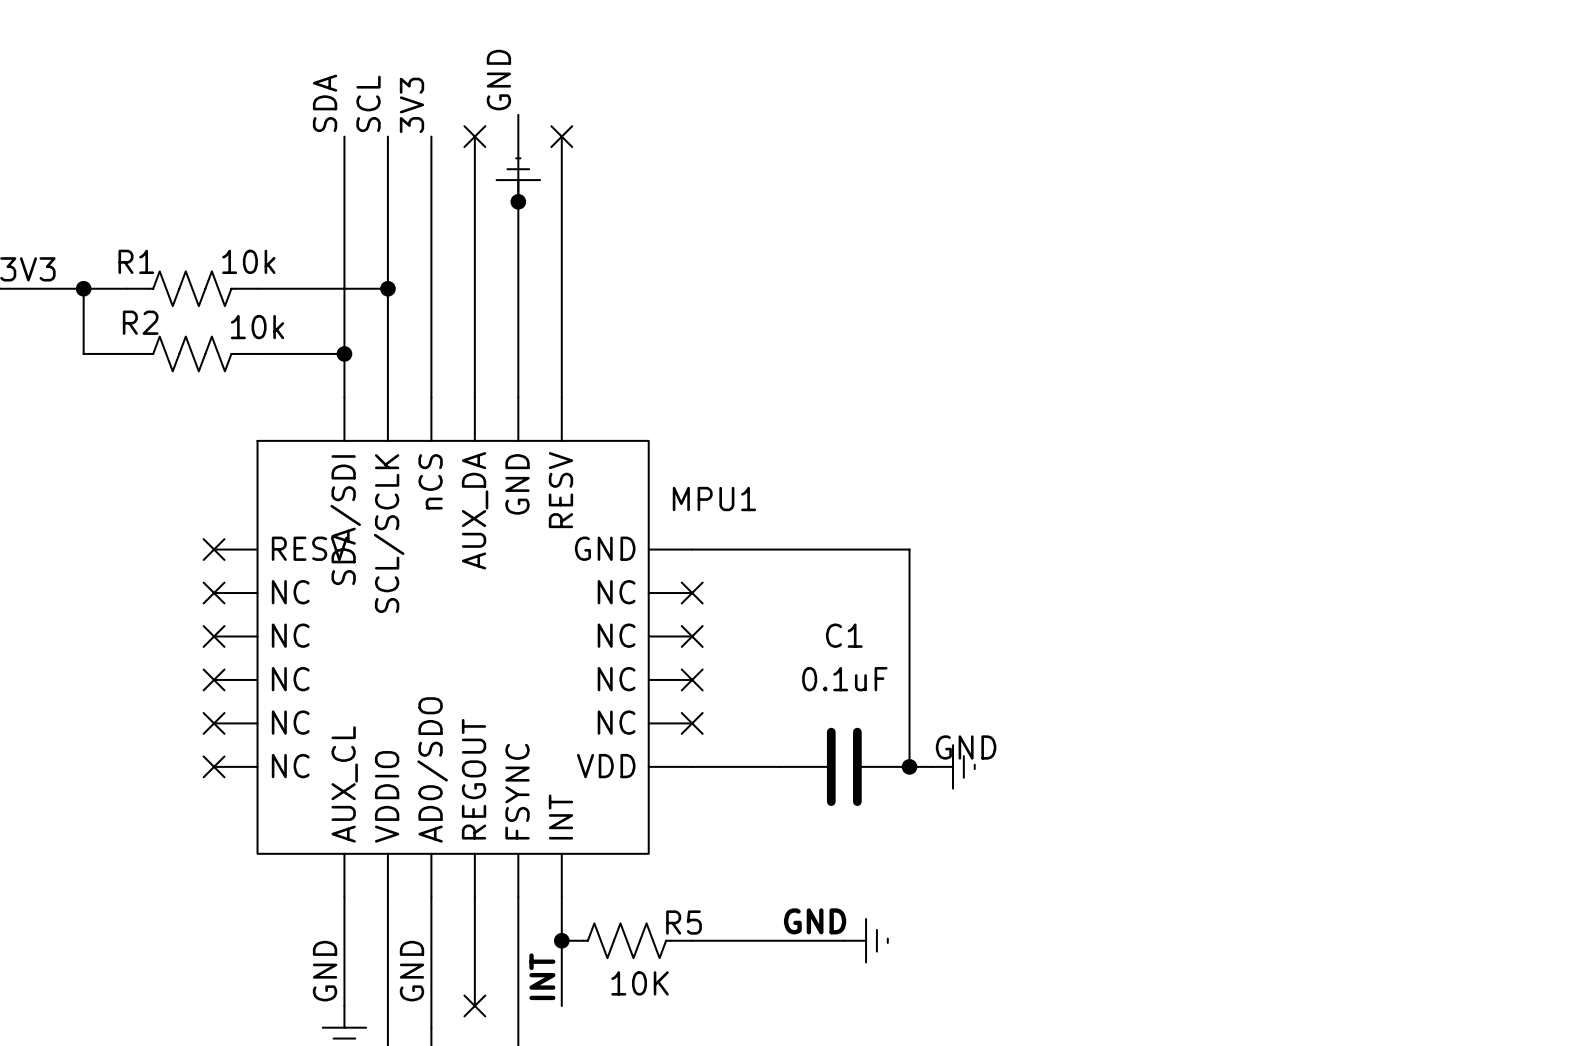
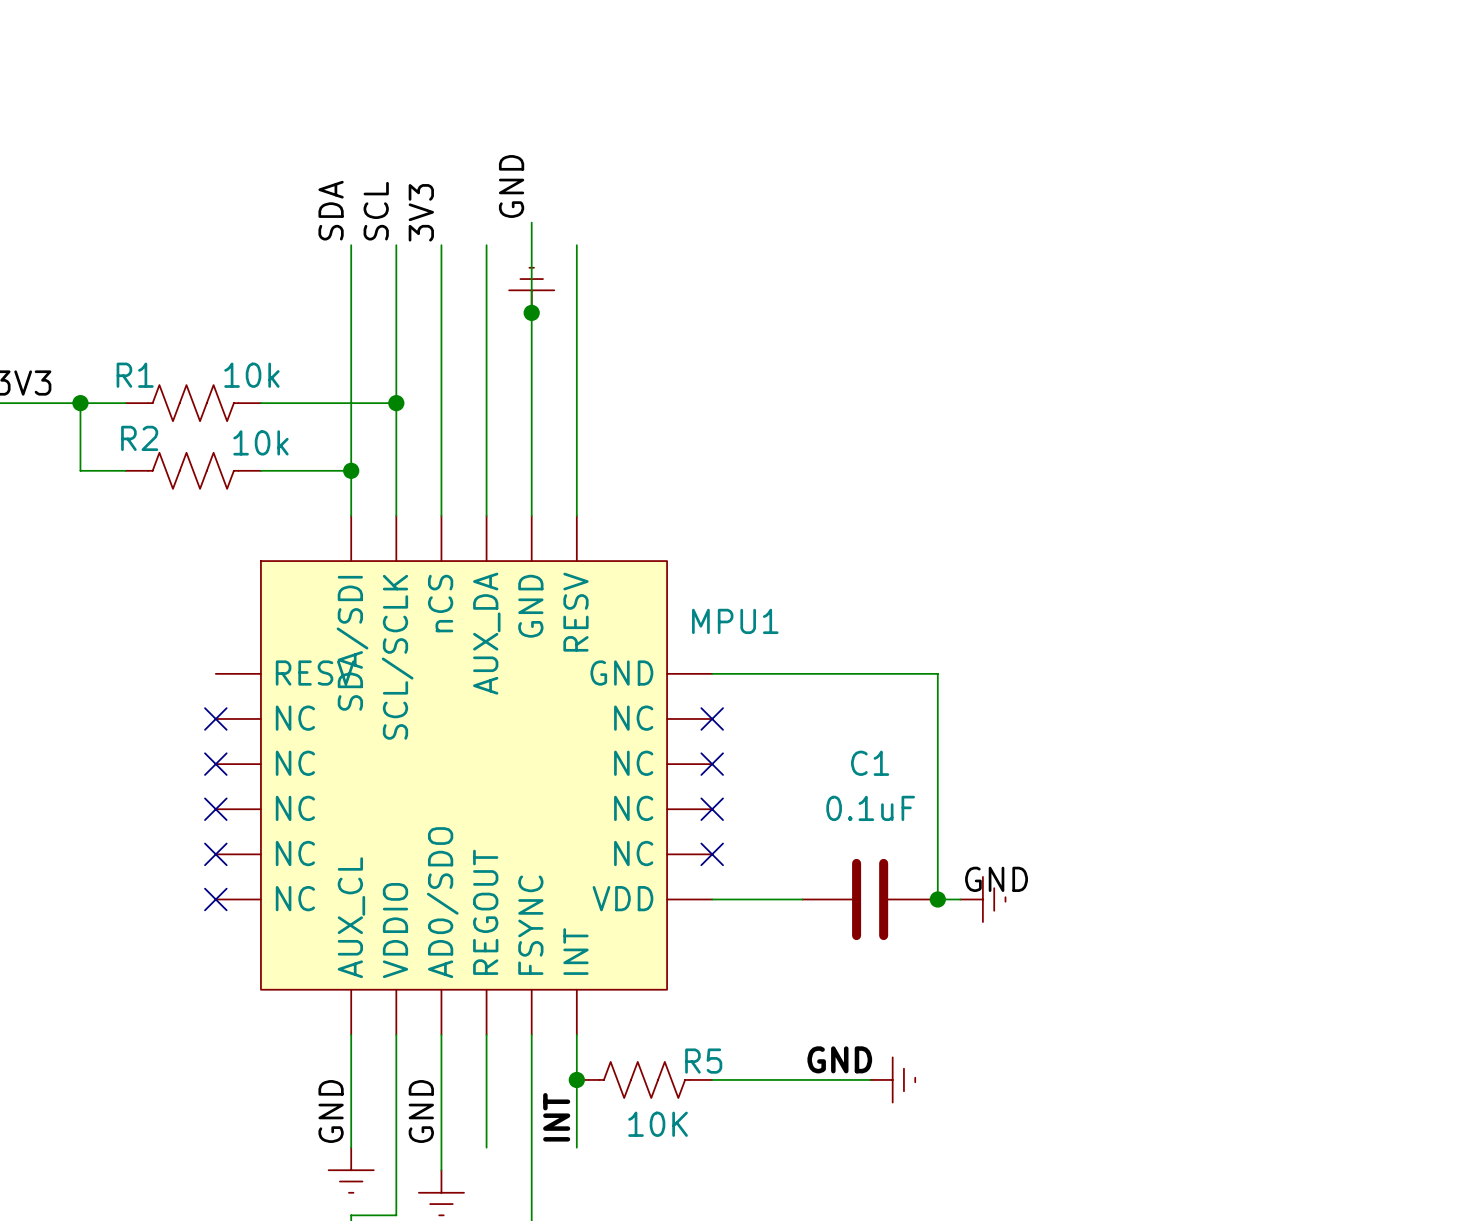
no-connect mark: (474, 136) -> none
no-connect mark: (561, 136) -> none
no-connect mark: (214, 549) -> none
no-connect mark: (474, 1005) -> none

